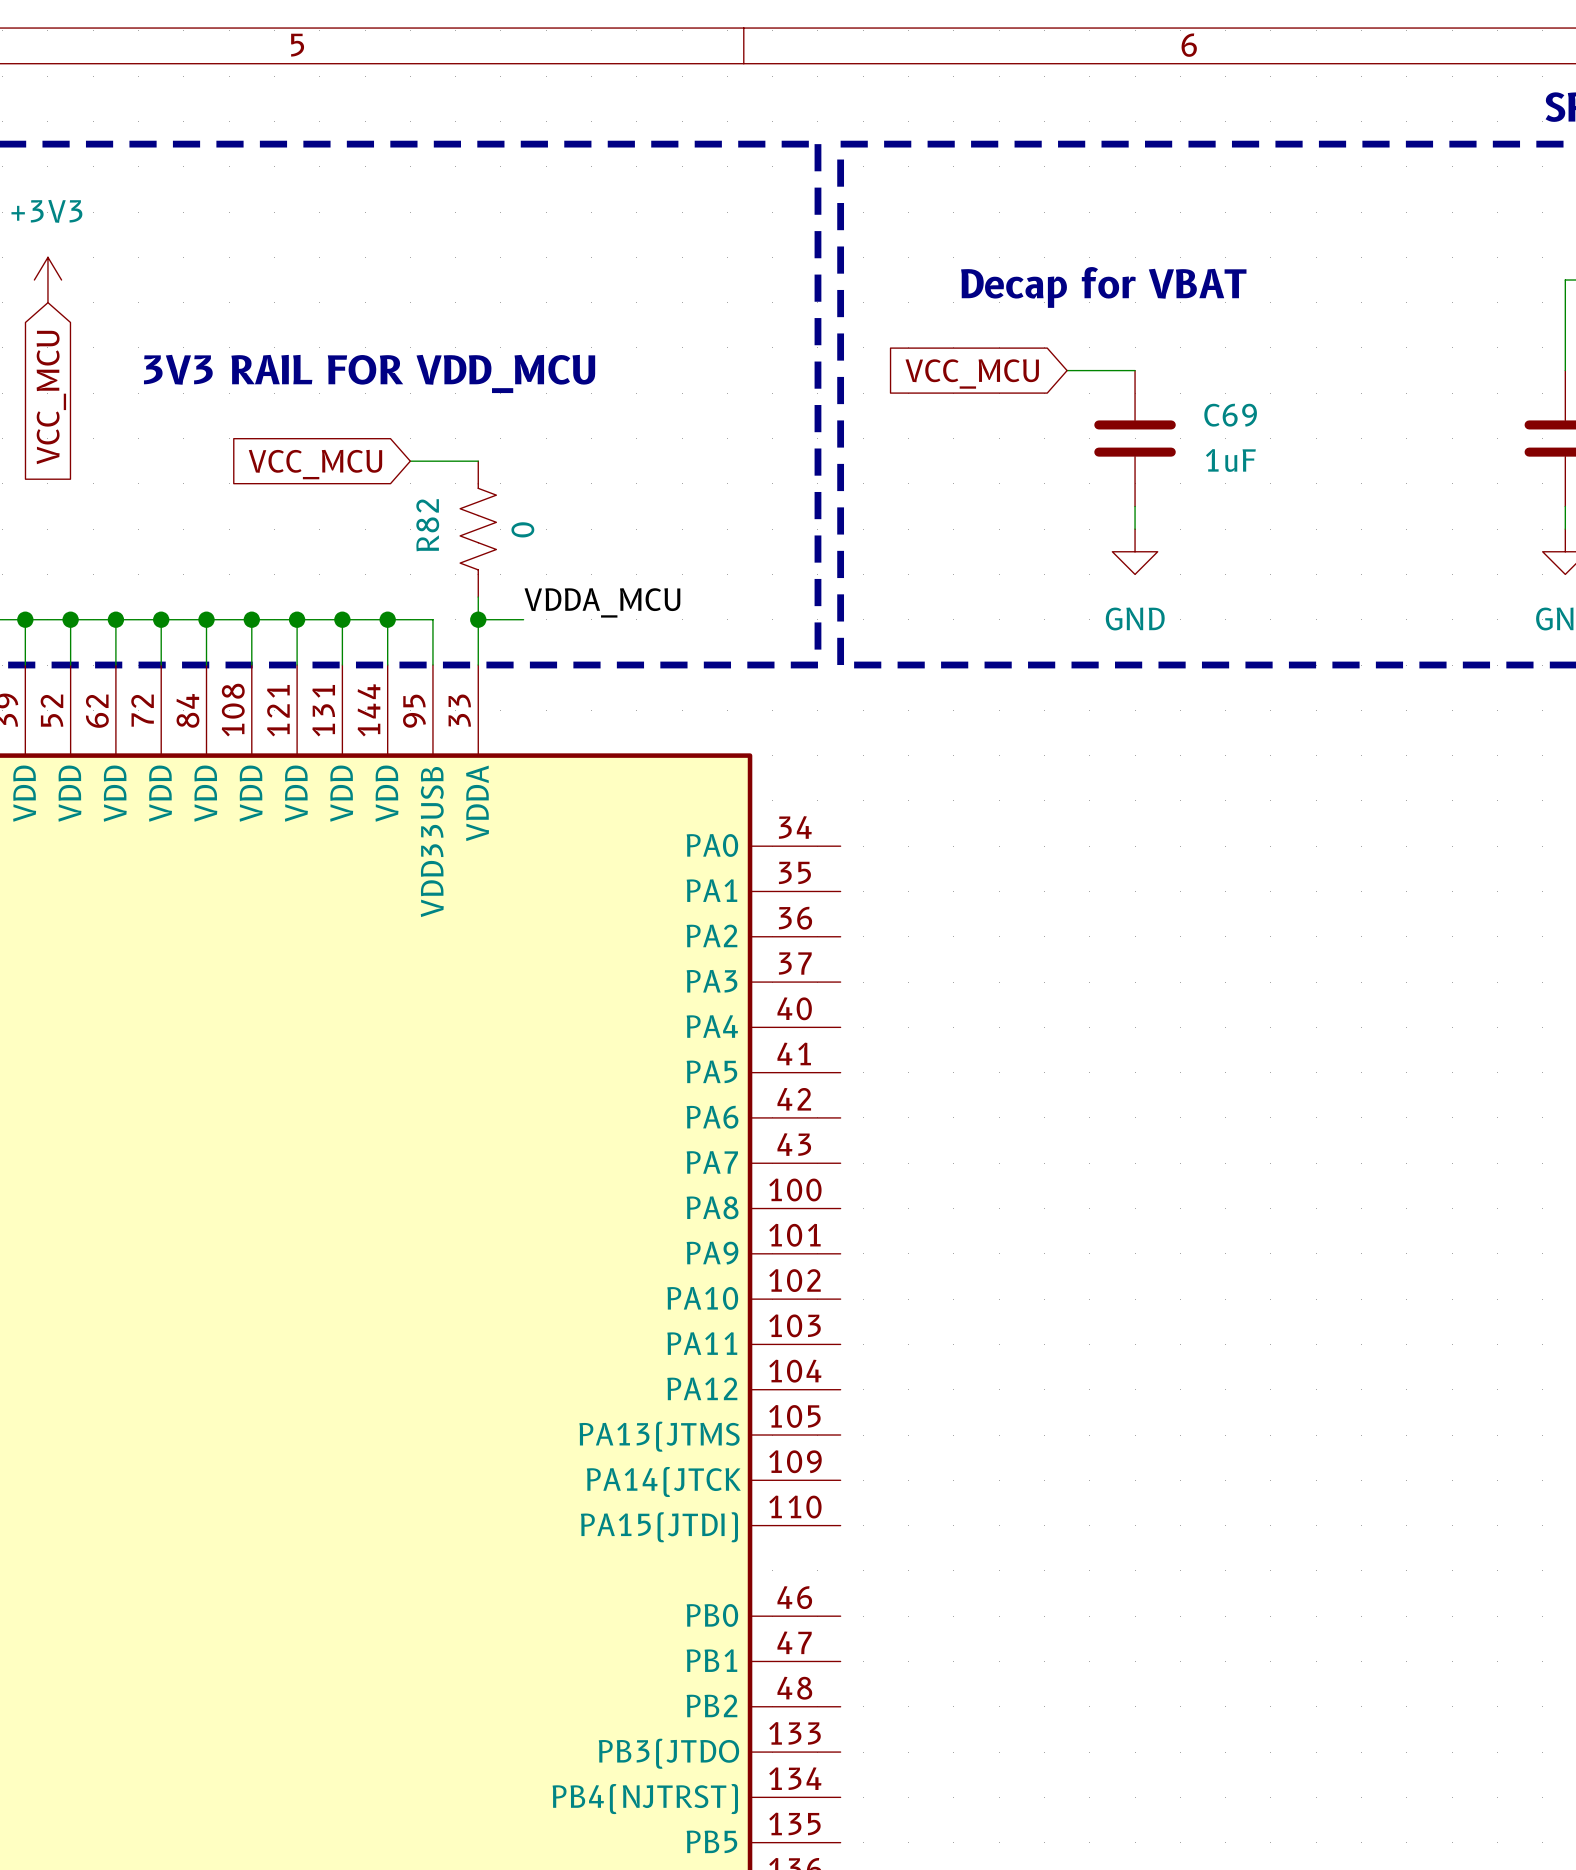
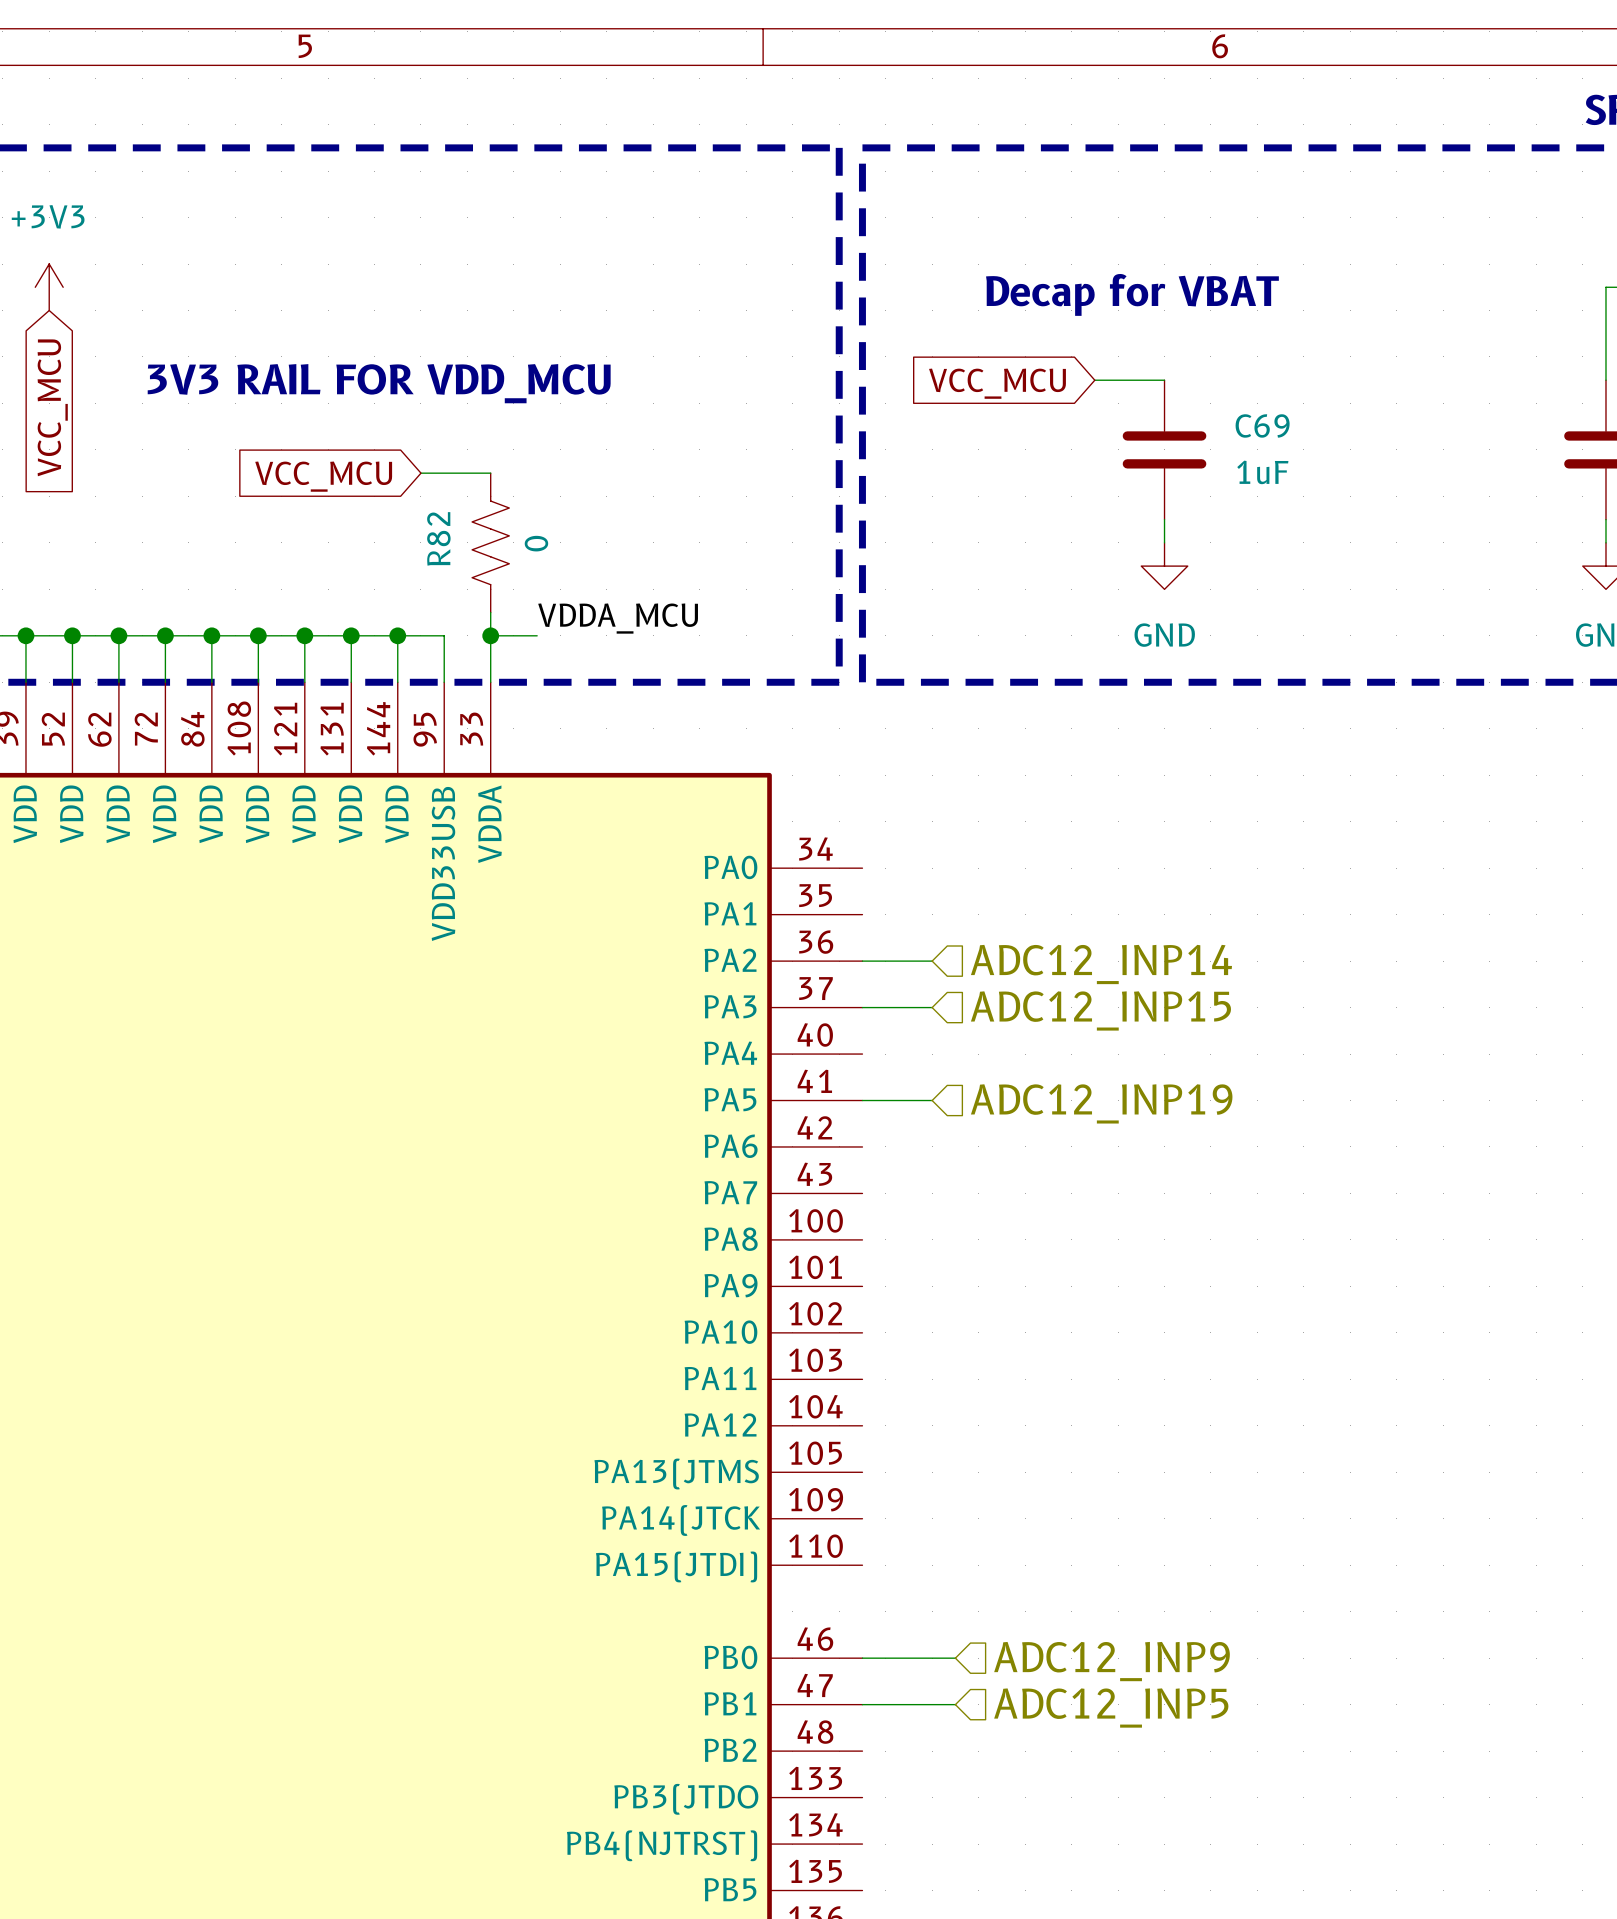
wire: none -> (862, 961) (932, 961)
hierarchical label: none -> ADC12_INP14 (1101, 964)
wire: none -> (862, 1007) (932, 1007)
hierarchical label: none -> ADC12_INP15 (1100, 1010)
wire: none -> (862, 1100) (932, 1100)
hierarchical label: none -> ADC12_INP19 (1101, 1103)
wire: none -> (862, 1658) (955, 1658)
hierarchical label: none -> ADC12_INP9 (1112, 1661)
wire: none -> (862, 1704) (955, 1704)
hierarchical label: none -> ADC12_INP5 (1111, 1708)

